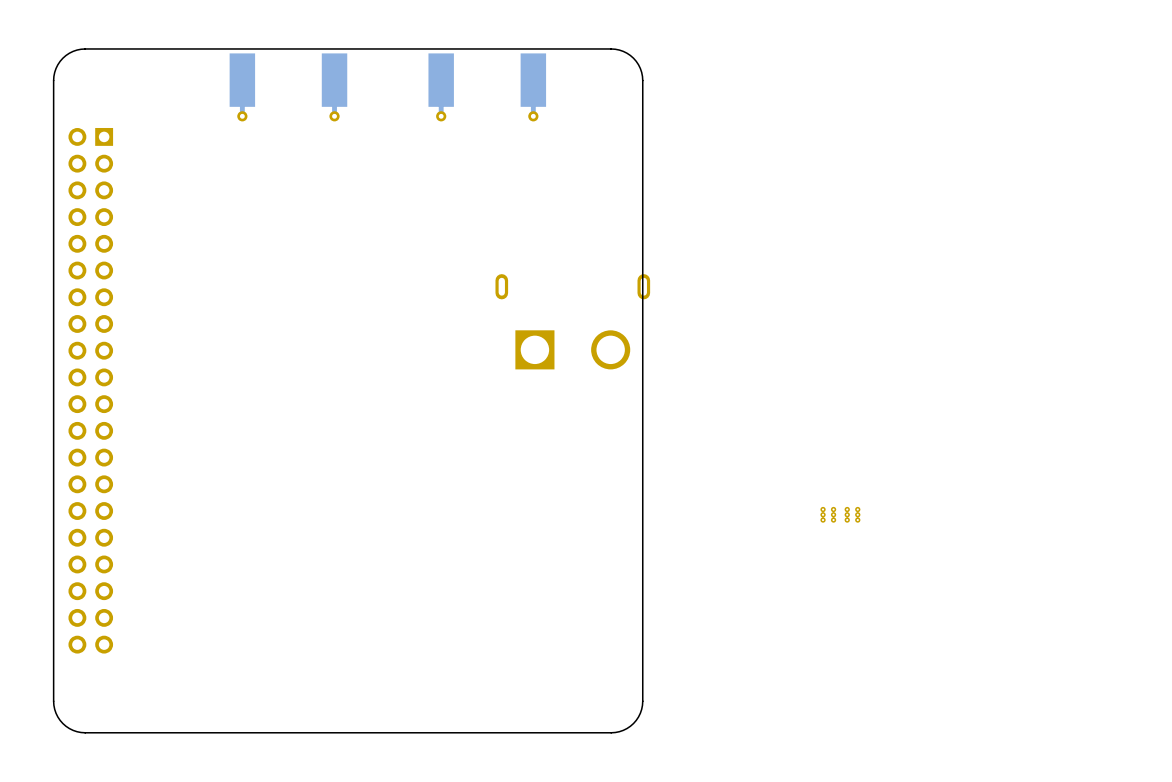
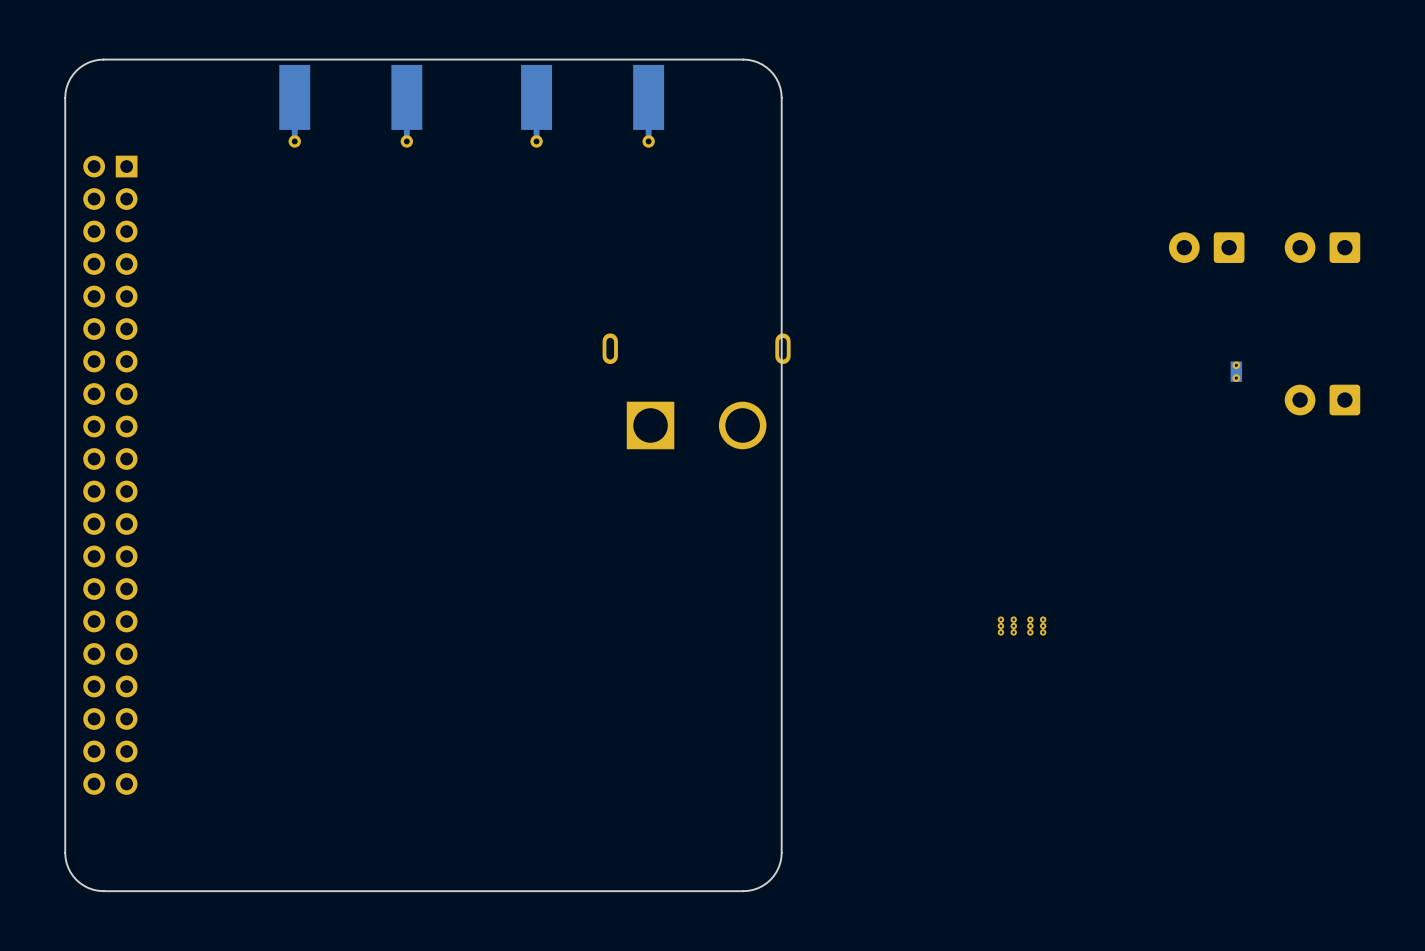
part: none -> (1206, 247)
part: none -> (1322, 247)
part: none -> (1236, 371)
part: none -> (1322, 400)

